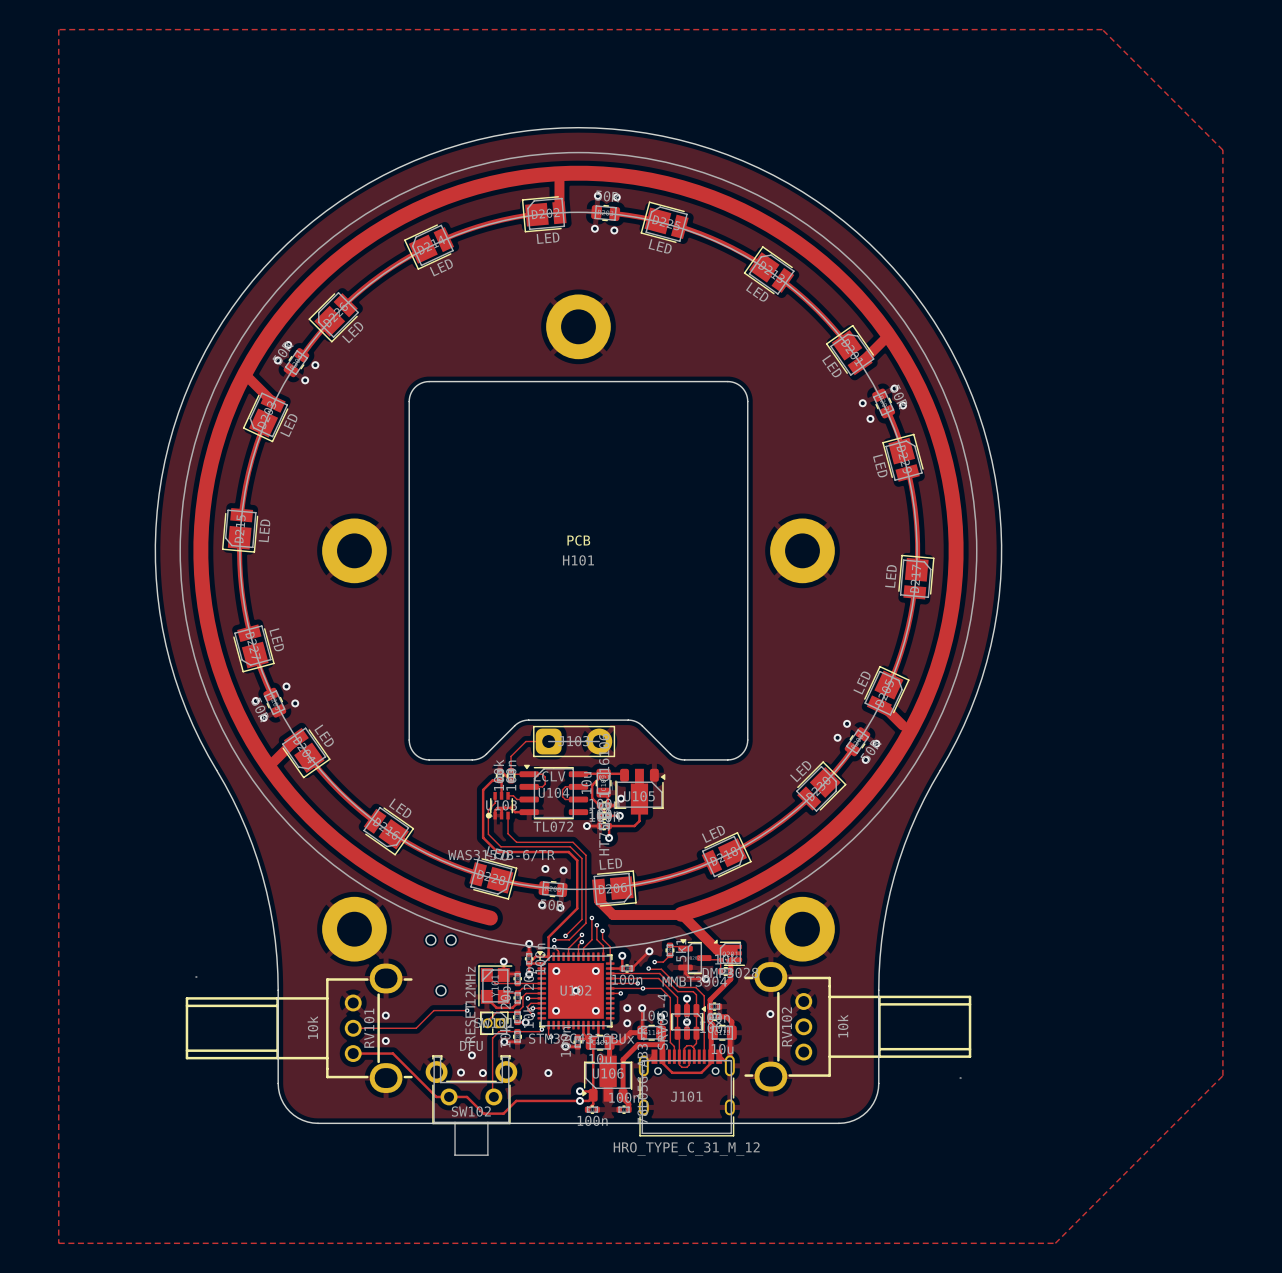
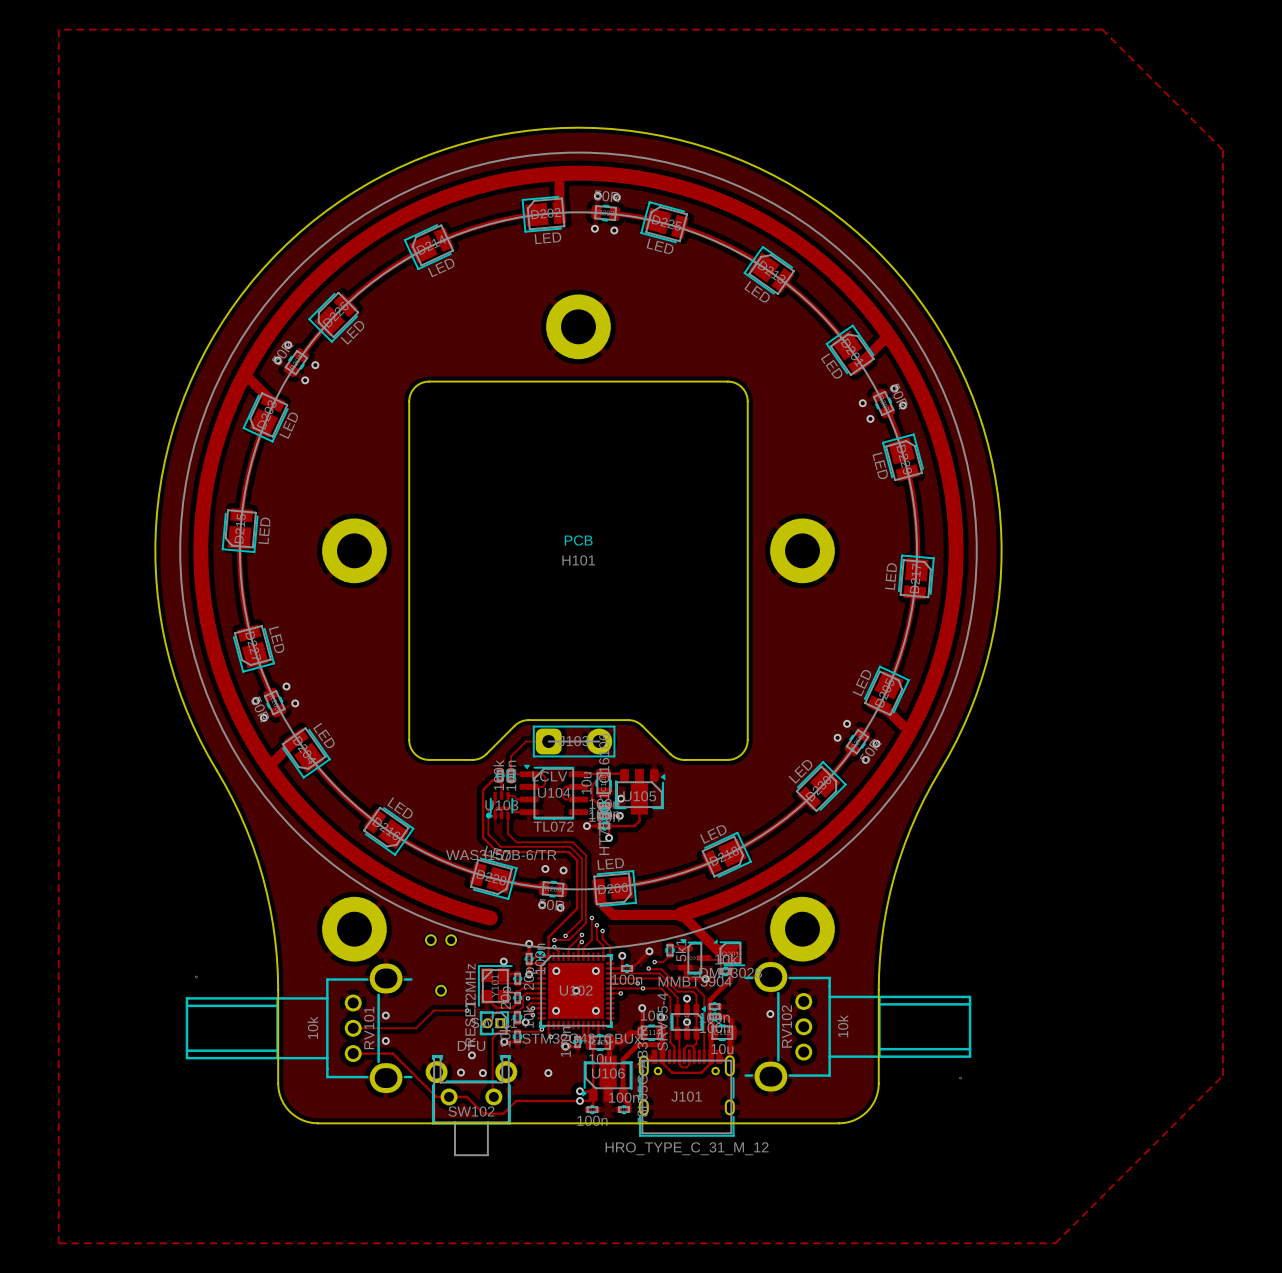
via: (627, 1008) -> none
via: (627, 1023) -> none

